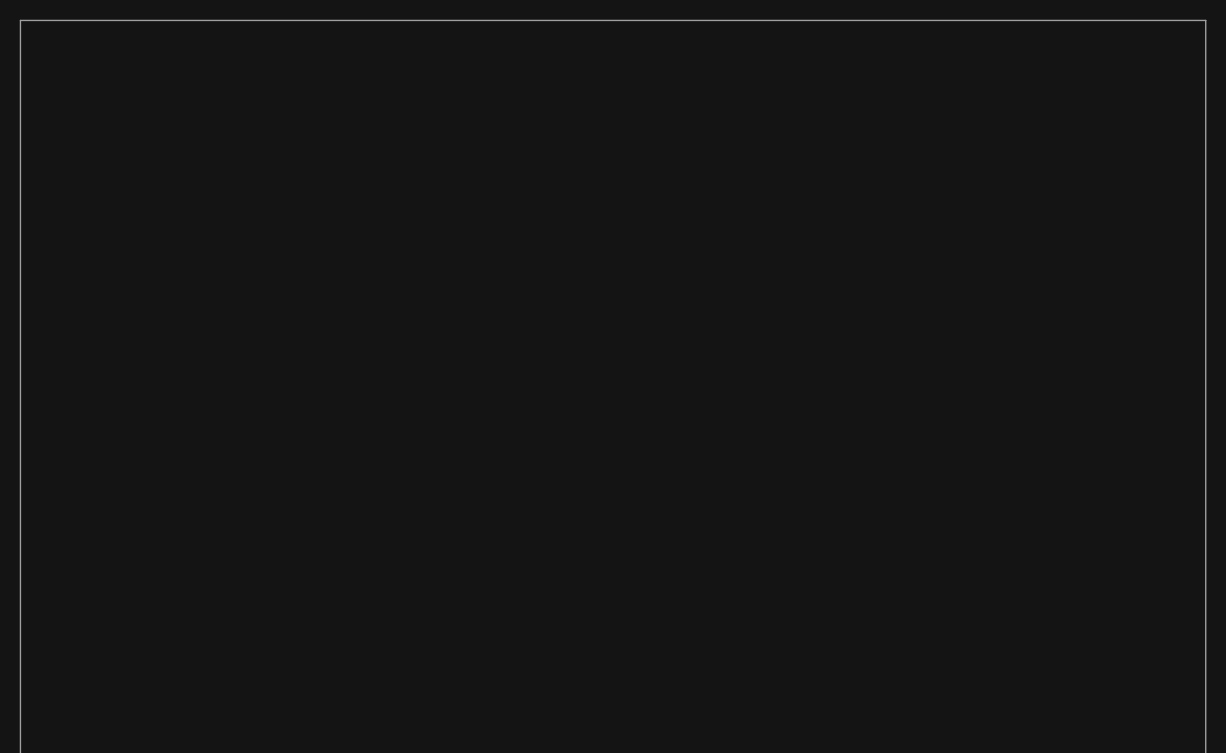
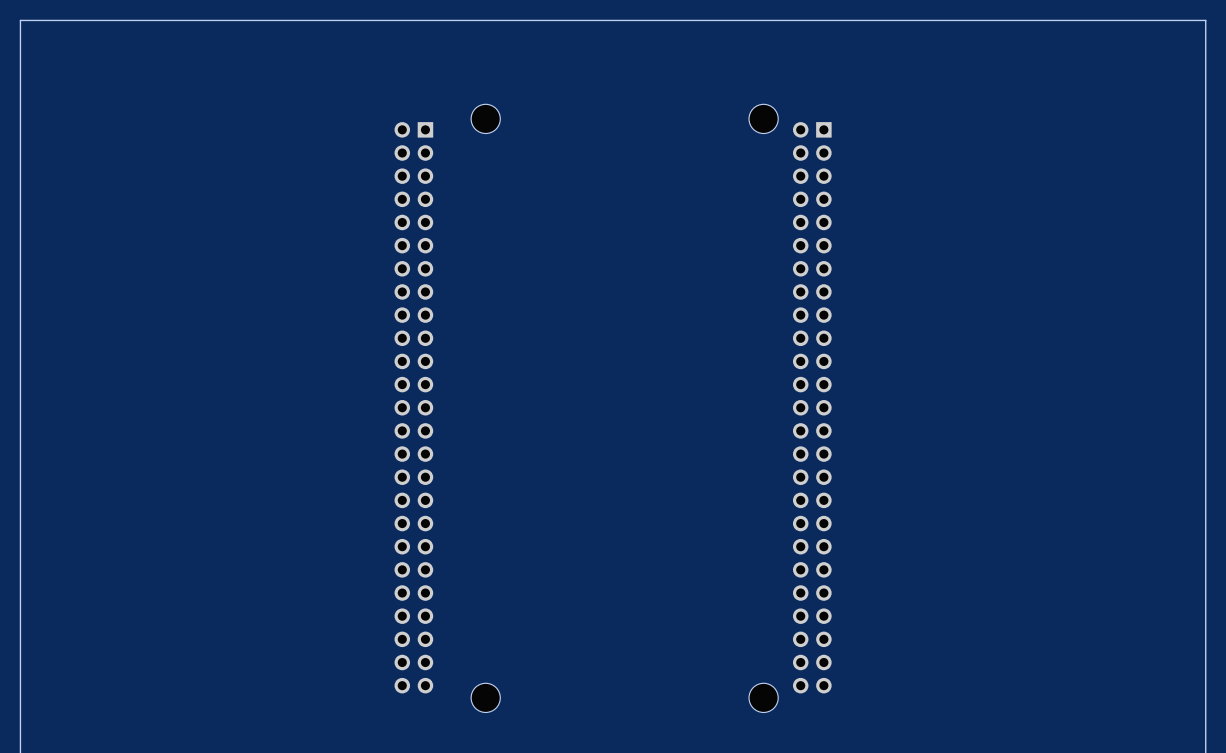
part: none -> (485, 118)
part: none -> (763, 118)
part: none -> (413, 407)
part: none -> (812, 407)
part: none -> (485, 697)
part: none -> (763, 697)

